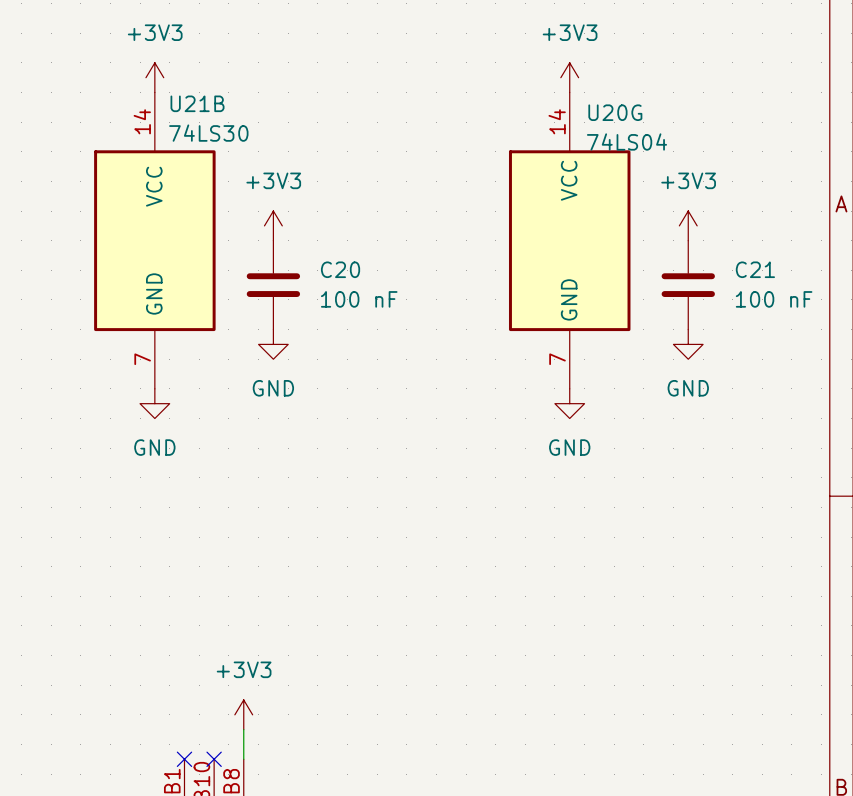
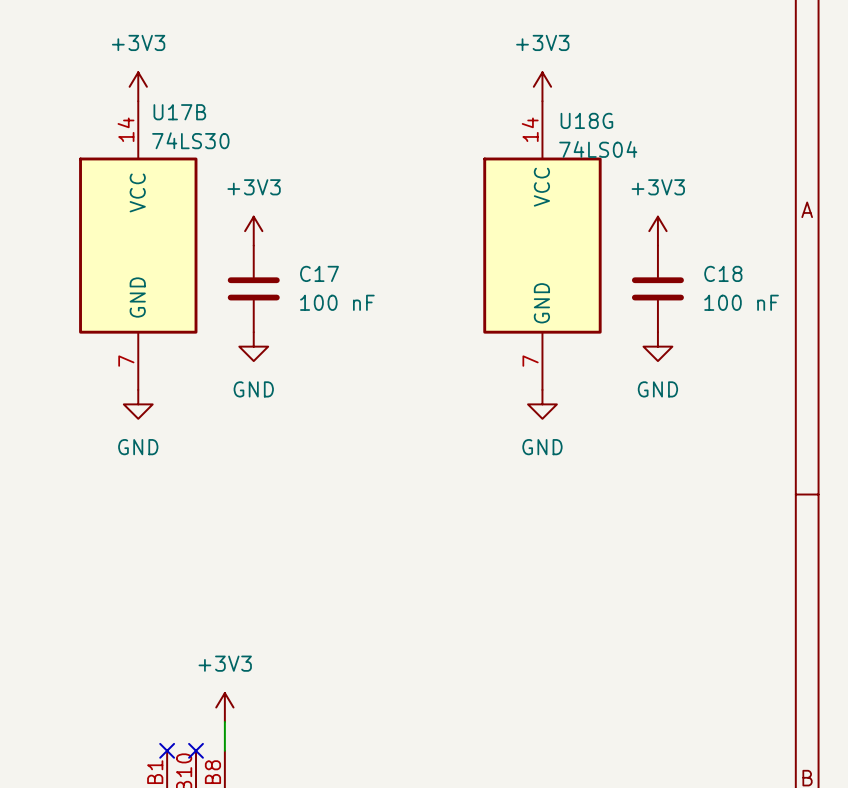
U21B name: U21B (197, 103) -> U17B (179, 112)
U20G name: U20G (615, 112) -> U18G (586, 120)
C20 name: C20 (340, 269) -> C17 (319, 273)
C21 name: C21 (755, 269) -> C18 (723, 273)

